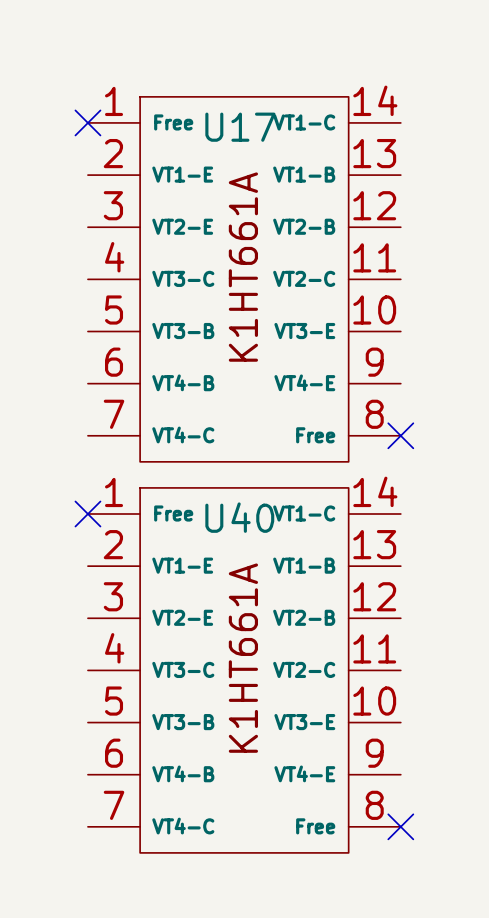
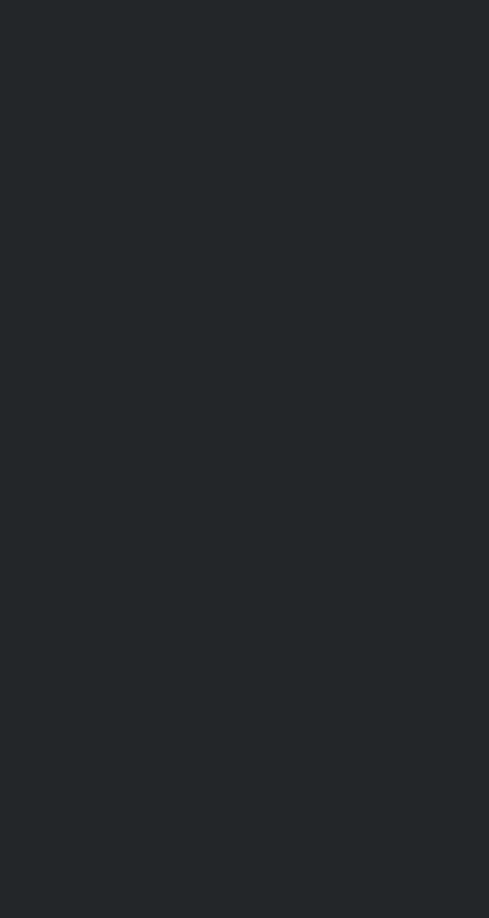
no-connect mark: (87, 122) -> none
U17: (244, 279) -> none
no-connect mark: (400, 435) -> none
no-connect mark: (87, 514) -> none
U40: (244, 670) -> none
no-connect mark: (400, 826) -> none

